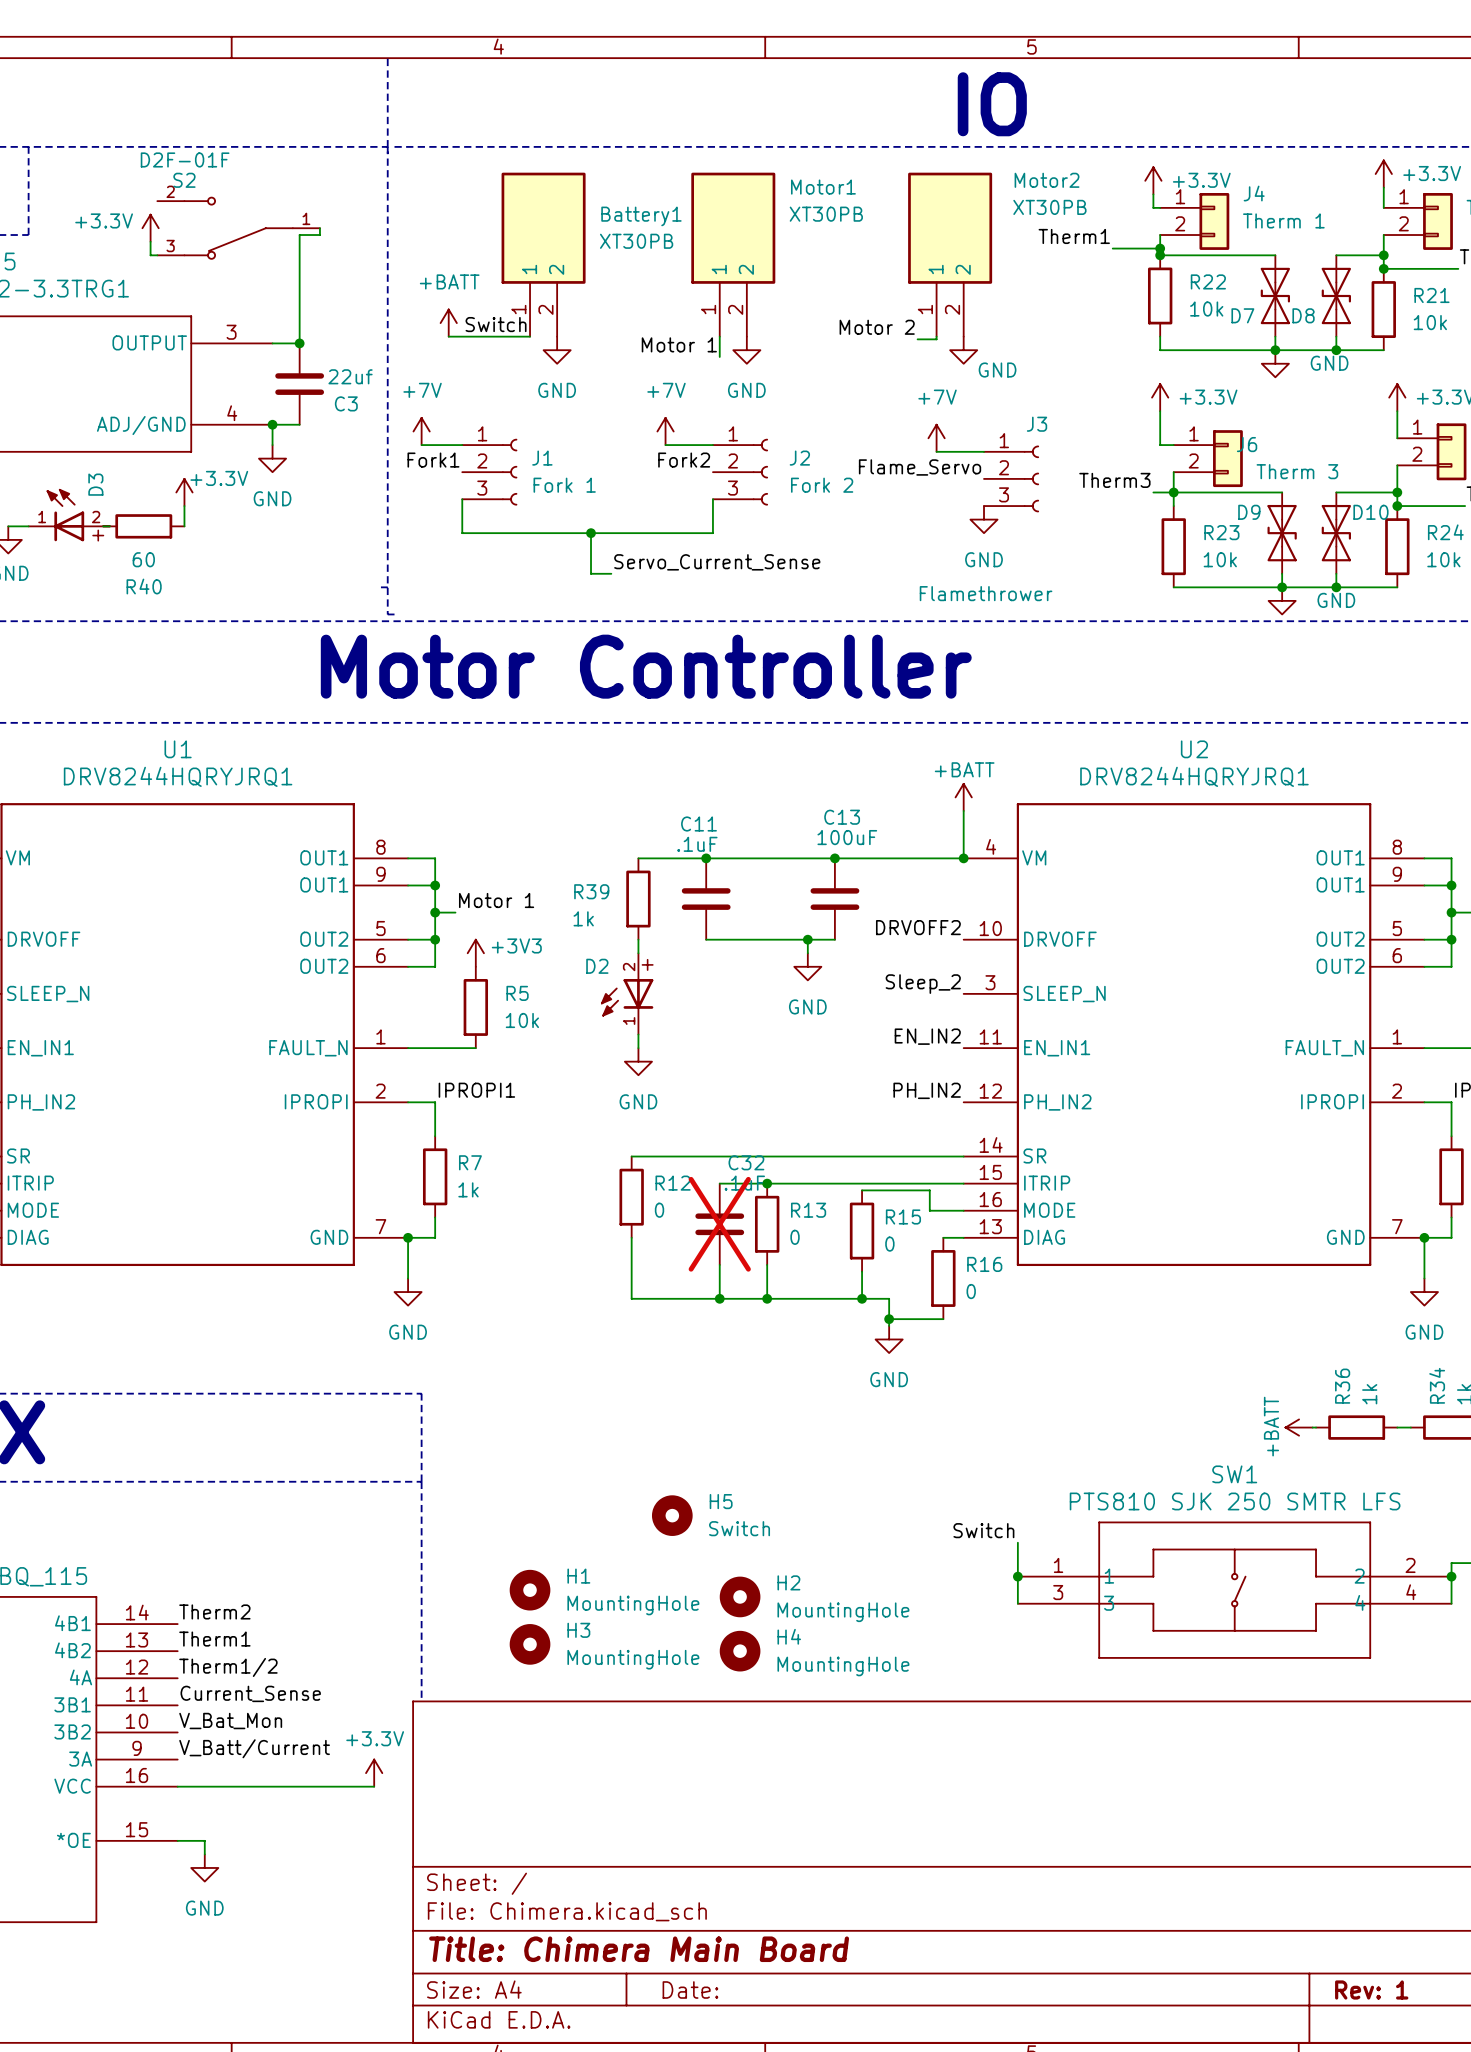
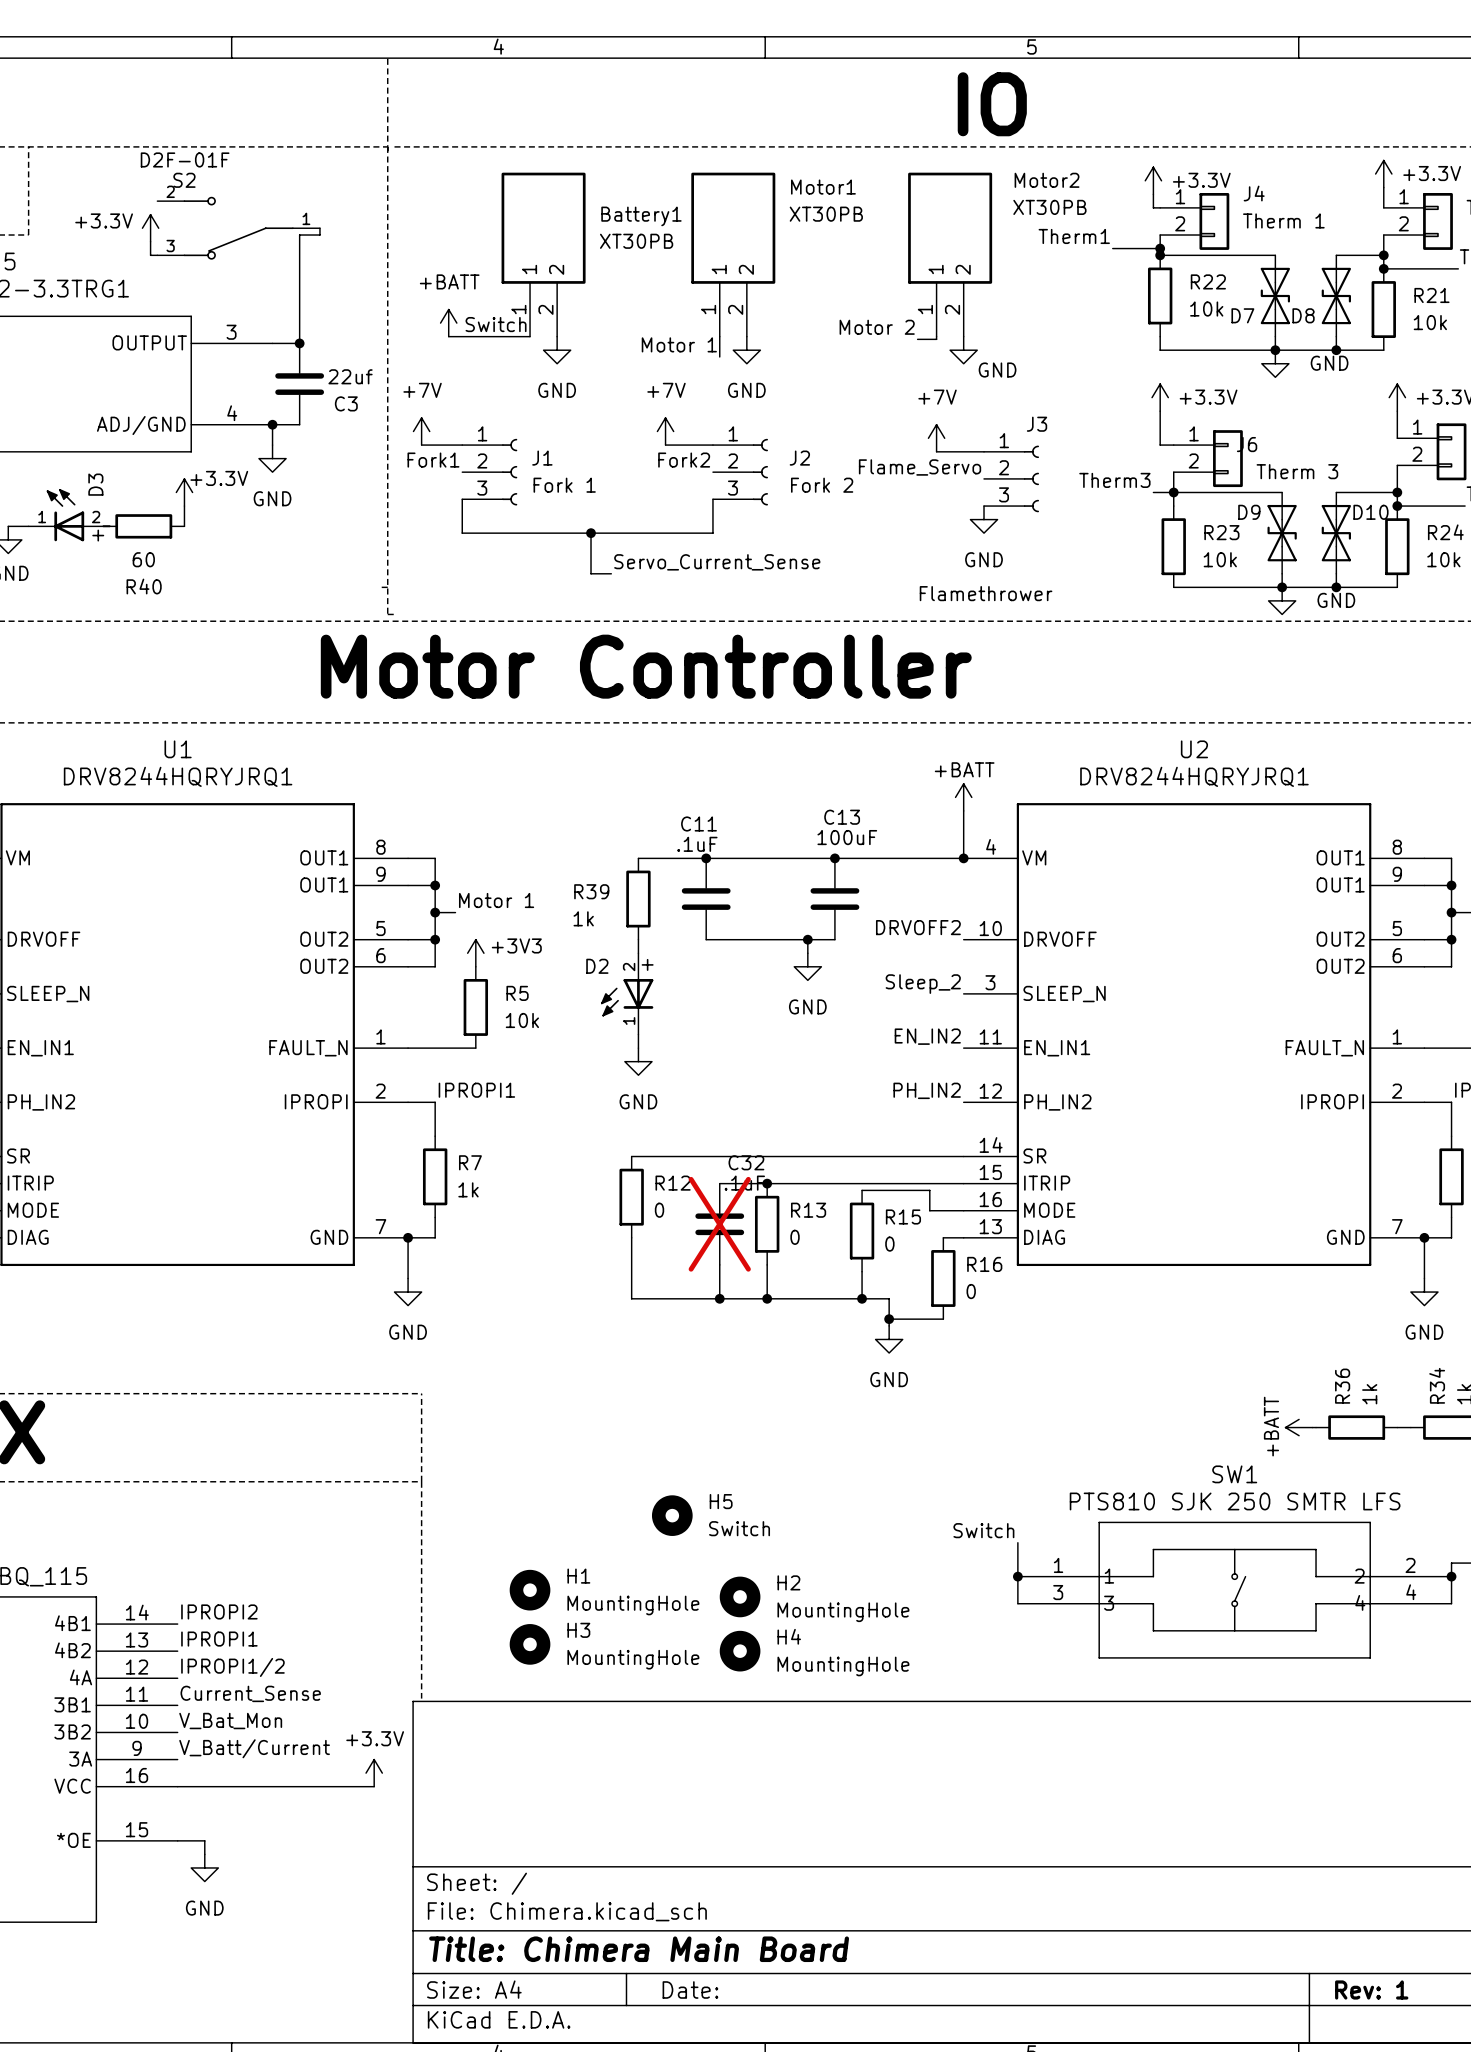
label: Therm2 (214, 1611) -> IPROPI2 (219, 1611)
label: Therm1 (214, 1639) -> IPROPI1 (219, 1639)
label: Therm1/2 (228, 1667) -> IPROPI1/2 (232, 1667)

